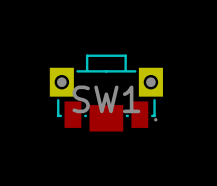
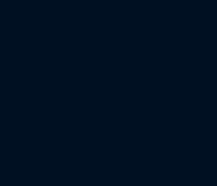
SW1: (106, 93) -> none

